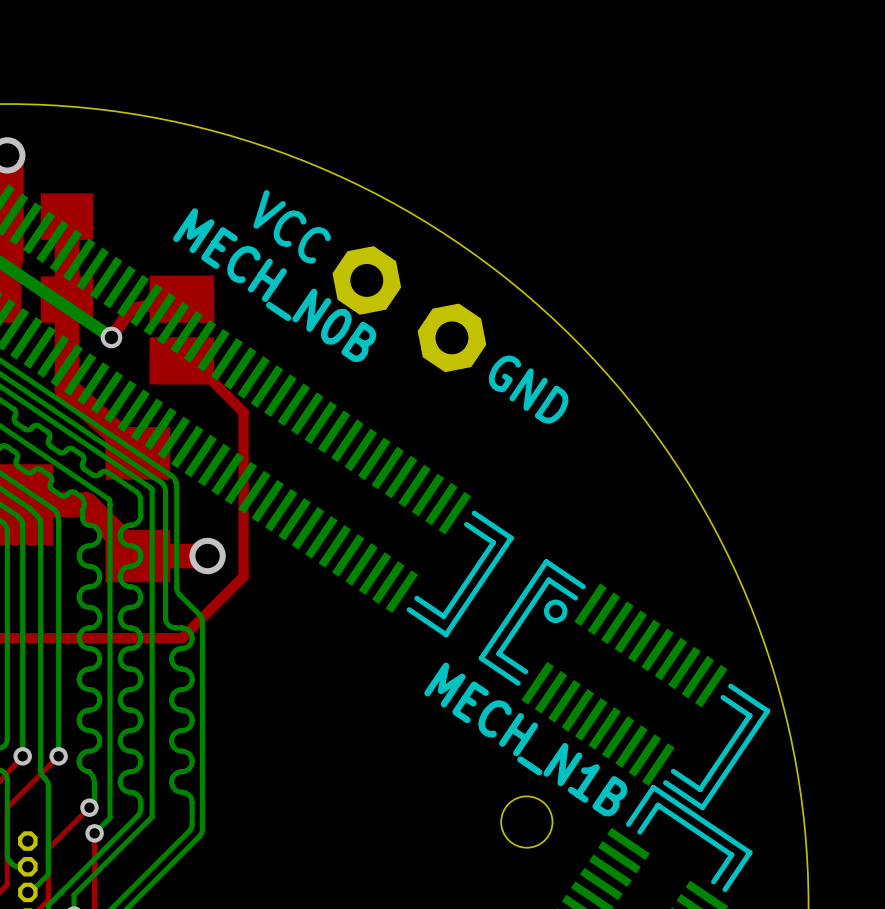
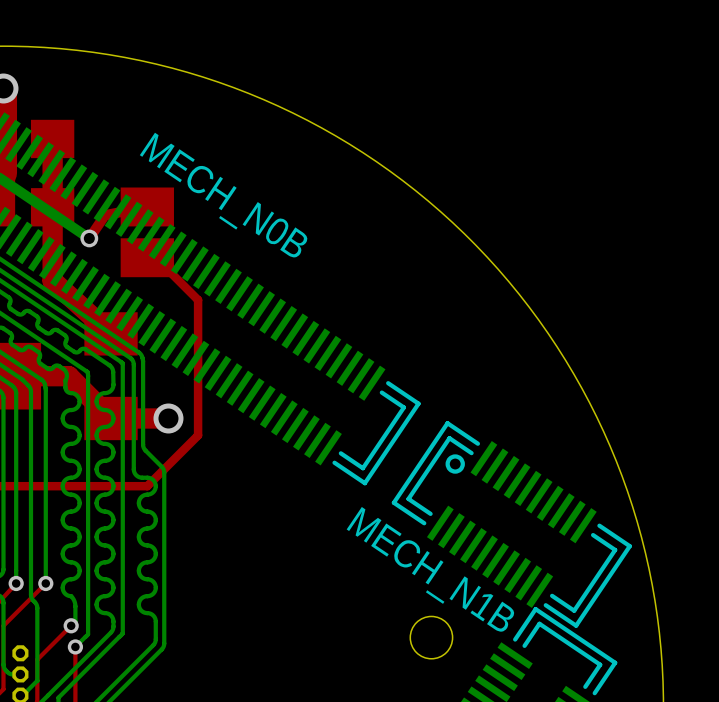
text: VCC (292, 226) -> none
part: (366, 280) -> none
part: (451, 337) -> none
text: GND (528, 389) -> none

